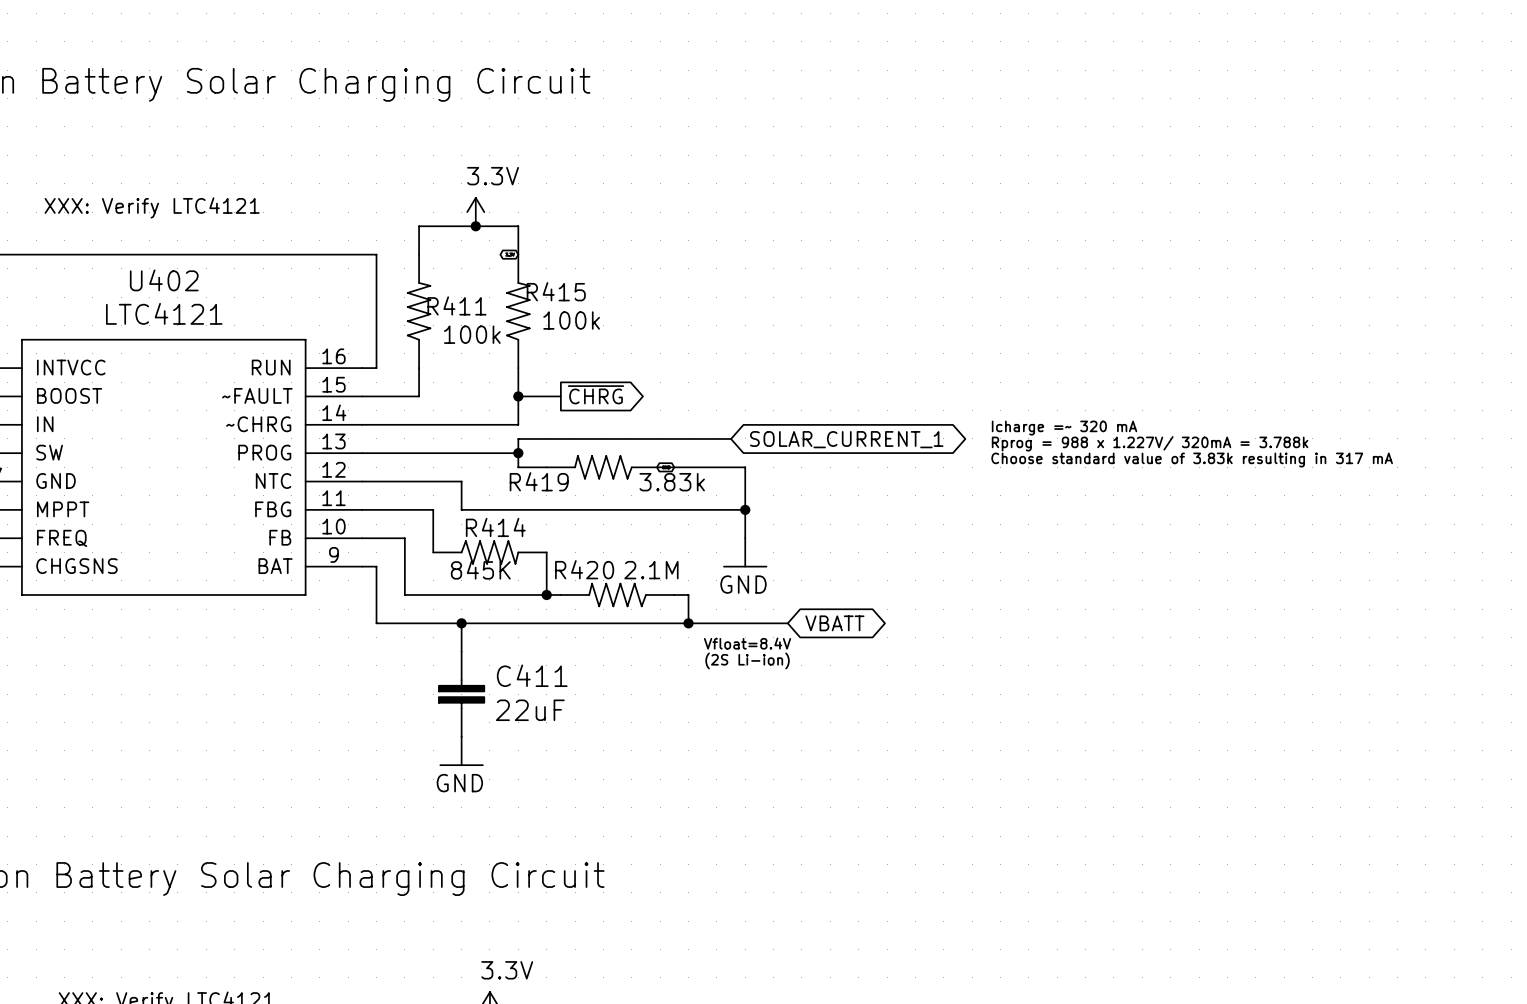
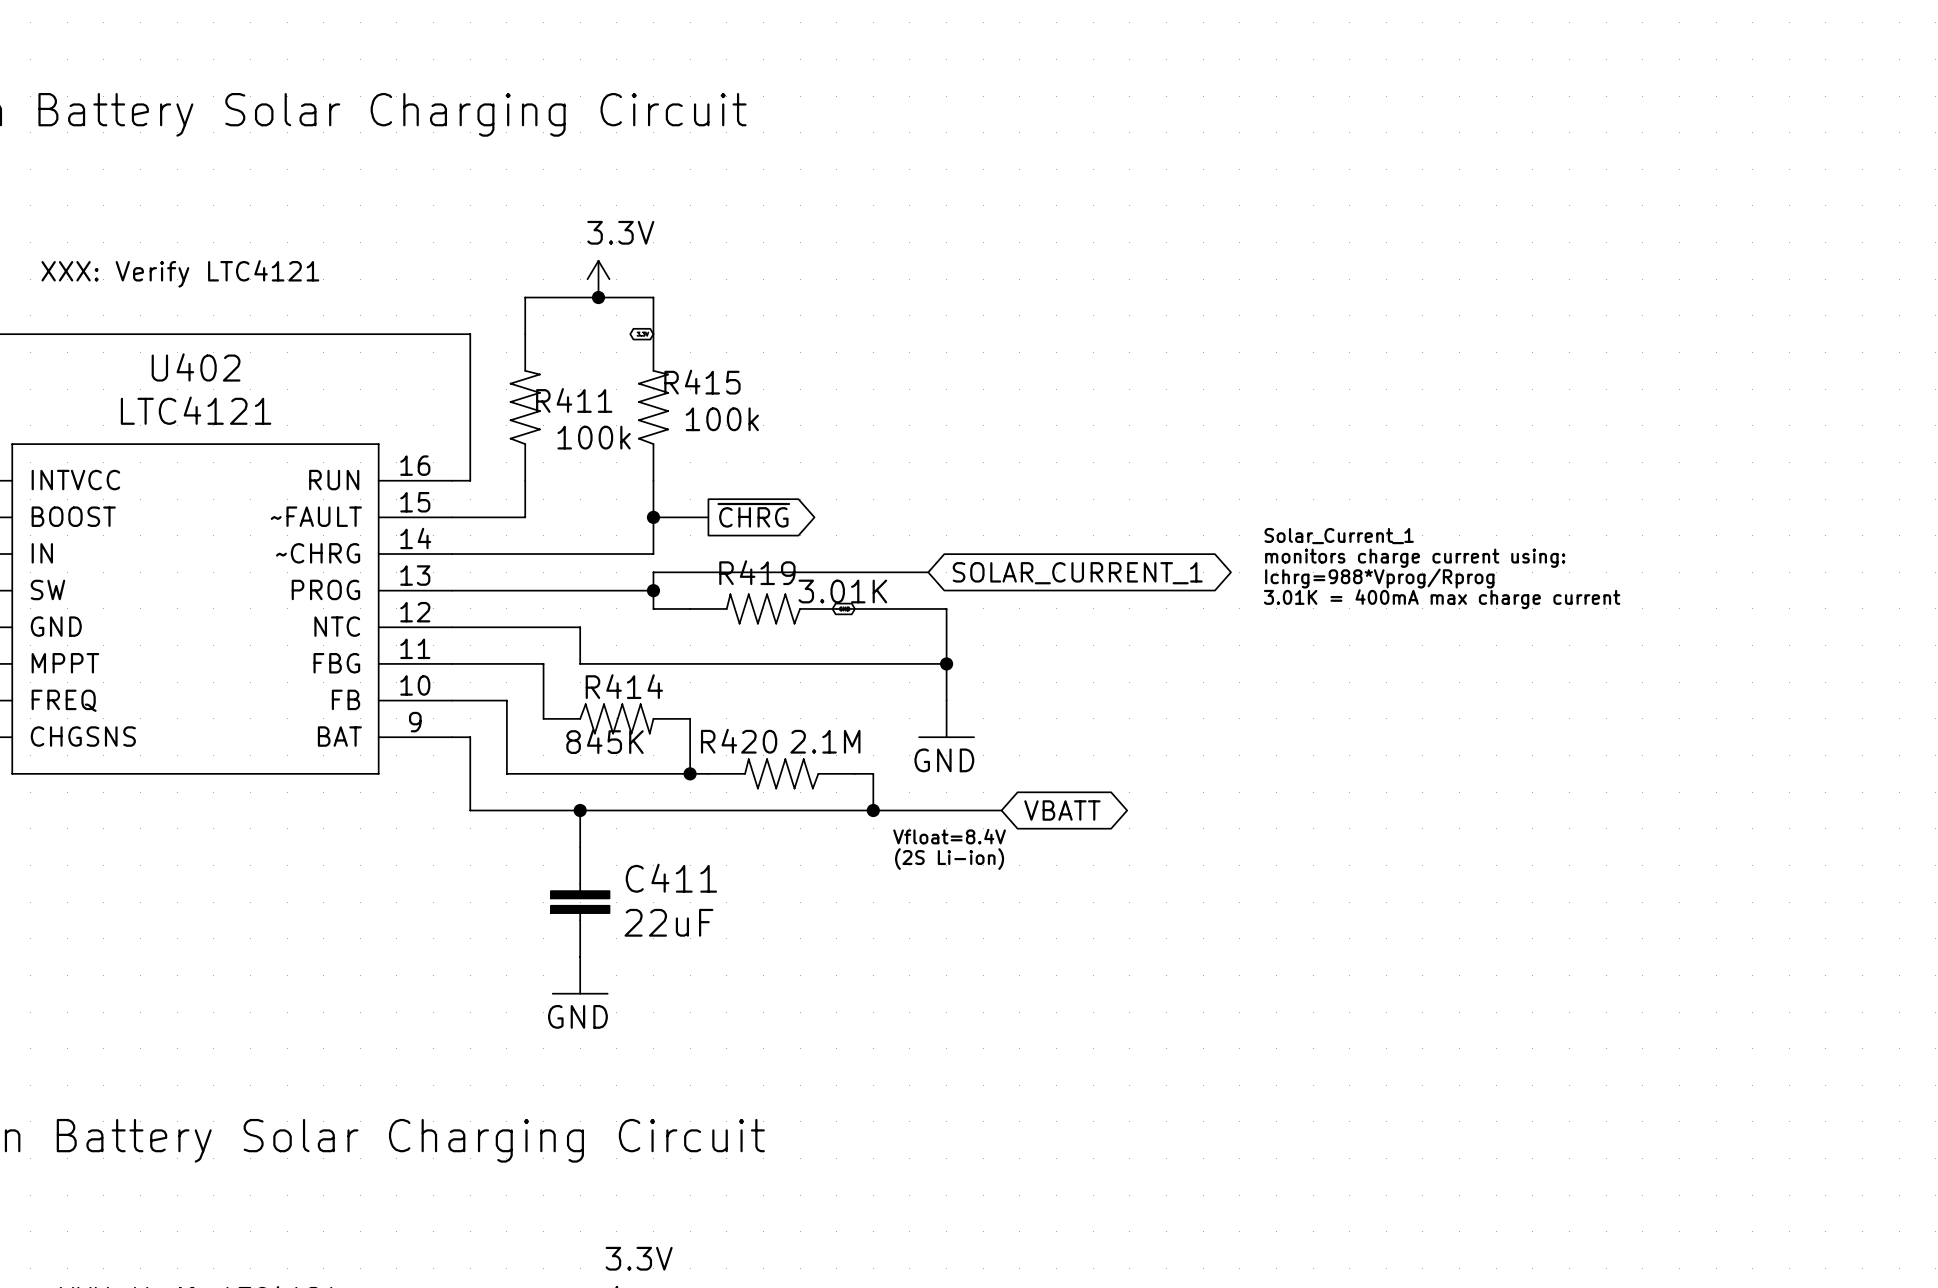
text: none -> Solar_Current_1 (1339, 536)
text: Icharge =~ 320 mA (1064, 428) -> monitors charge current using: (1415, 558)
text: Rprog = 988 x 1.227V/ 320mA = 3.788k (1150, 443) -> Ichrg=988*Vprog/Rprog (1379, 578)
text: Choose standard value of 3.83k resulting in 317 mA (1192, 460) -> 3.01K = 400mA max charge current (1442, 599)
R419 name position: R419 (539, 481) -> R419 (757, 572)
R419 value: 3.83k (672, 482) -> 3.01K (842, 591)

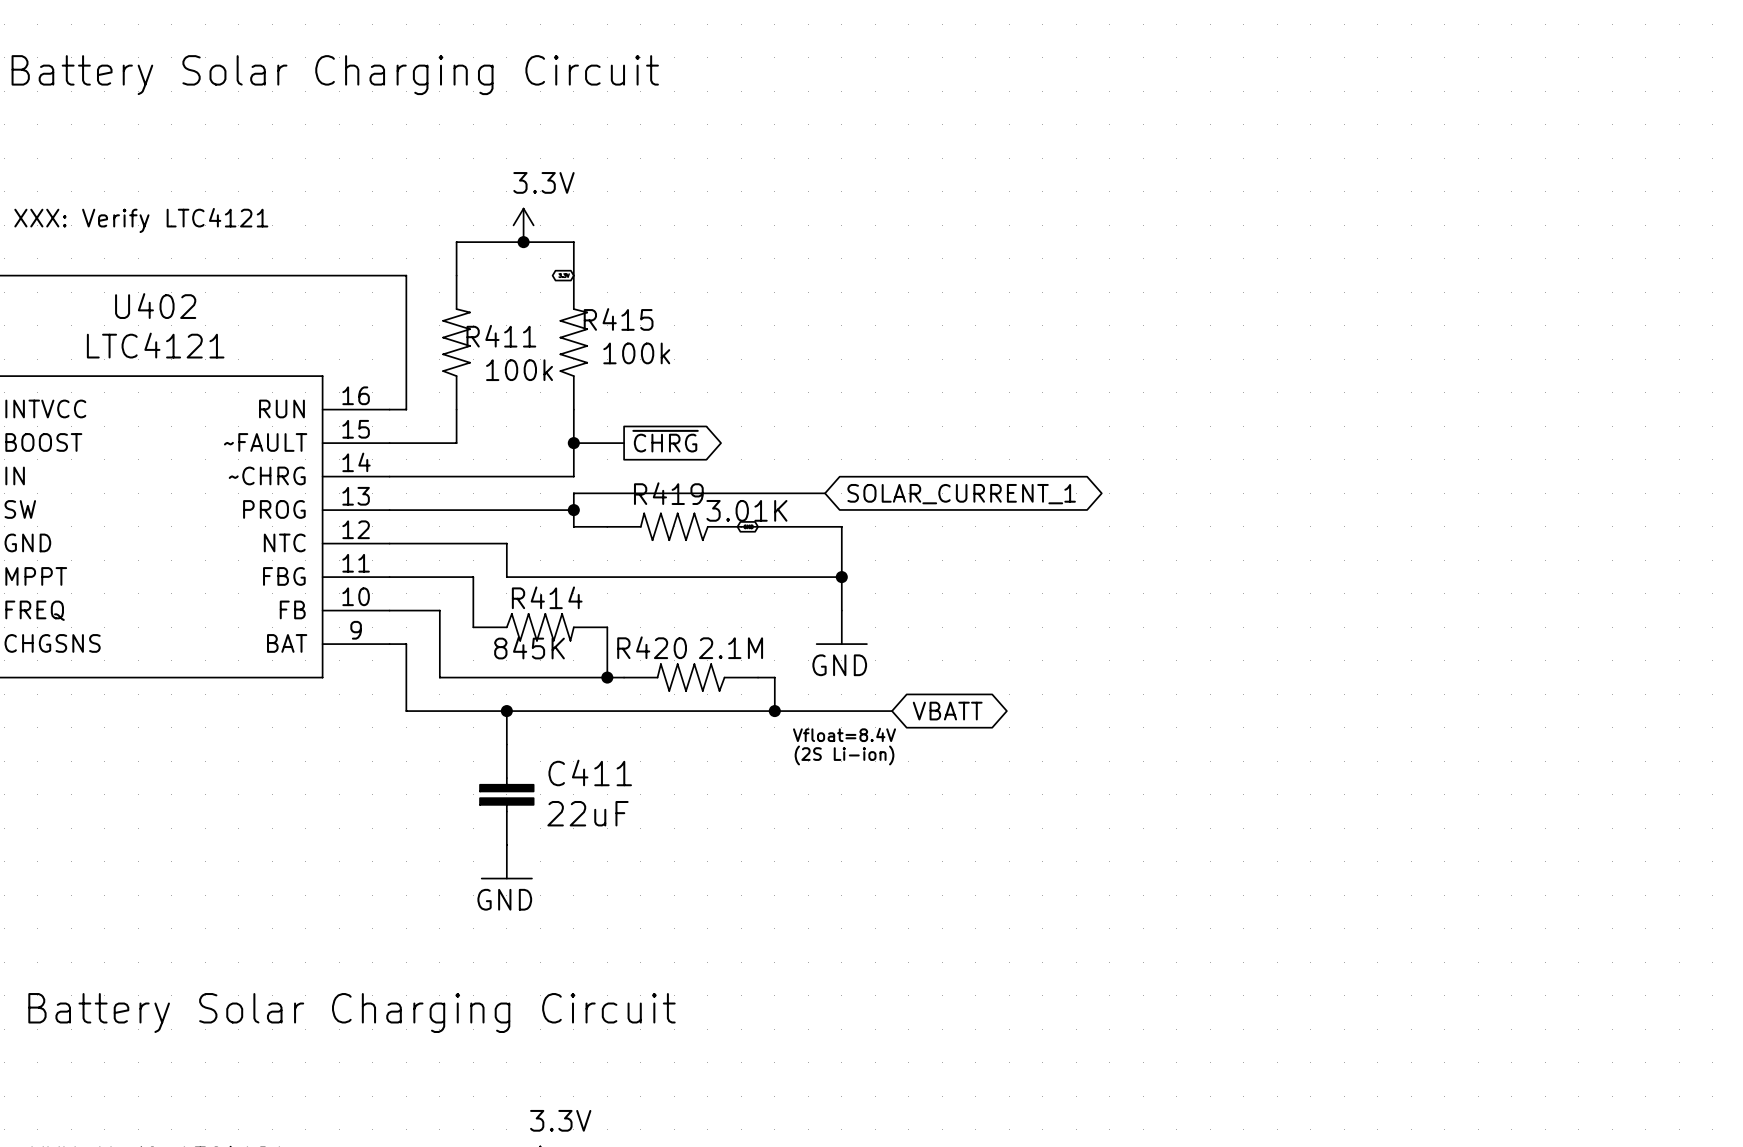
text: Solar_Current_1 (1339, 536) -> none
text: monitors charge current using: (1415, 558) -> none
text: Ichrg=988*Vprog/Rprog (1379, 578) -> none
text: 3.01K = 400mA max charge current (1442, 599) -> none

